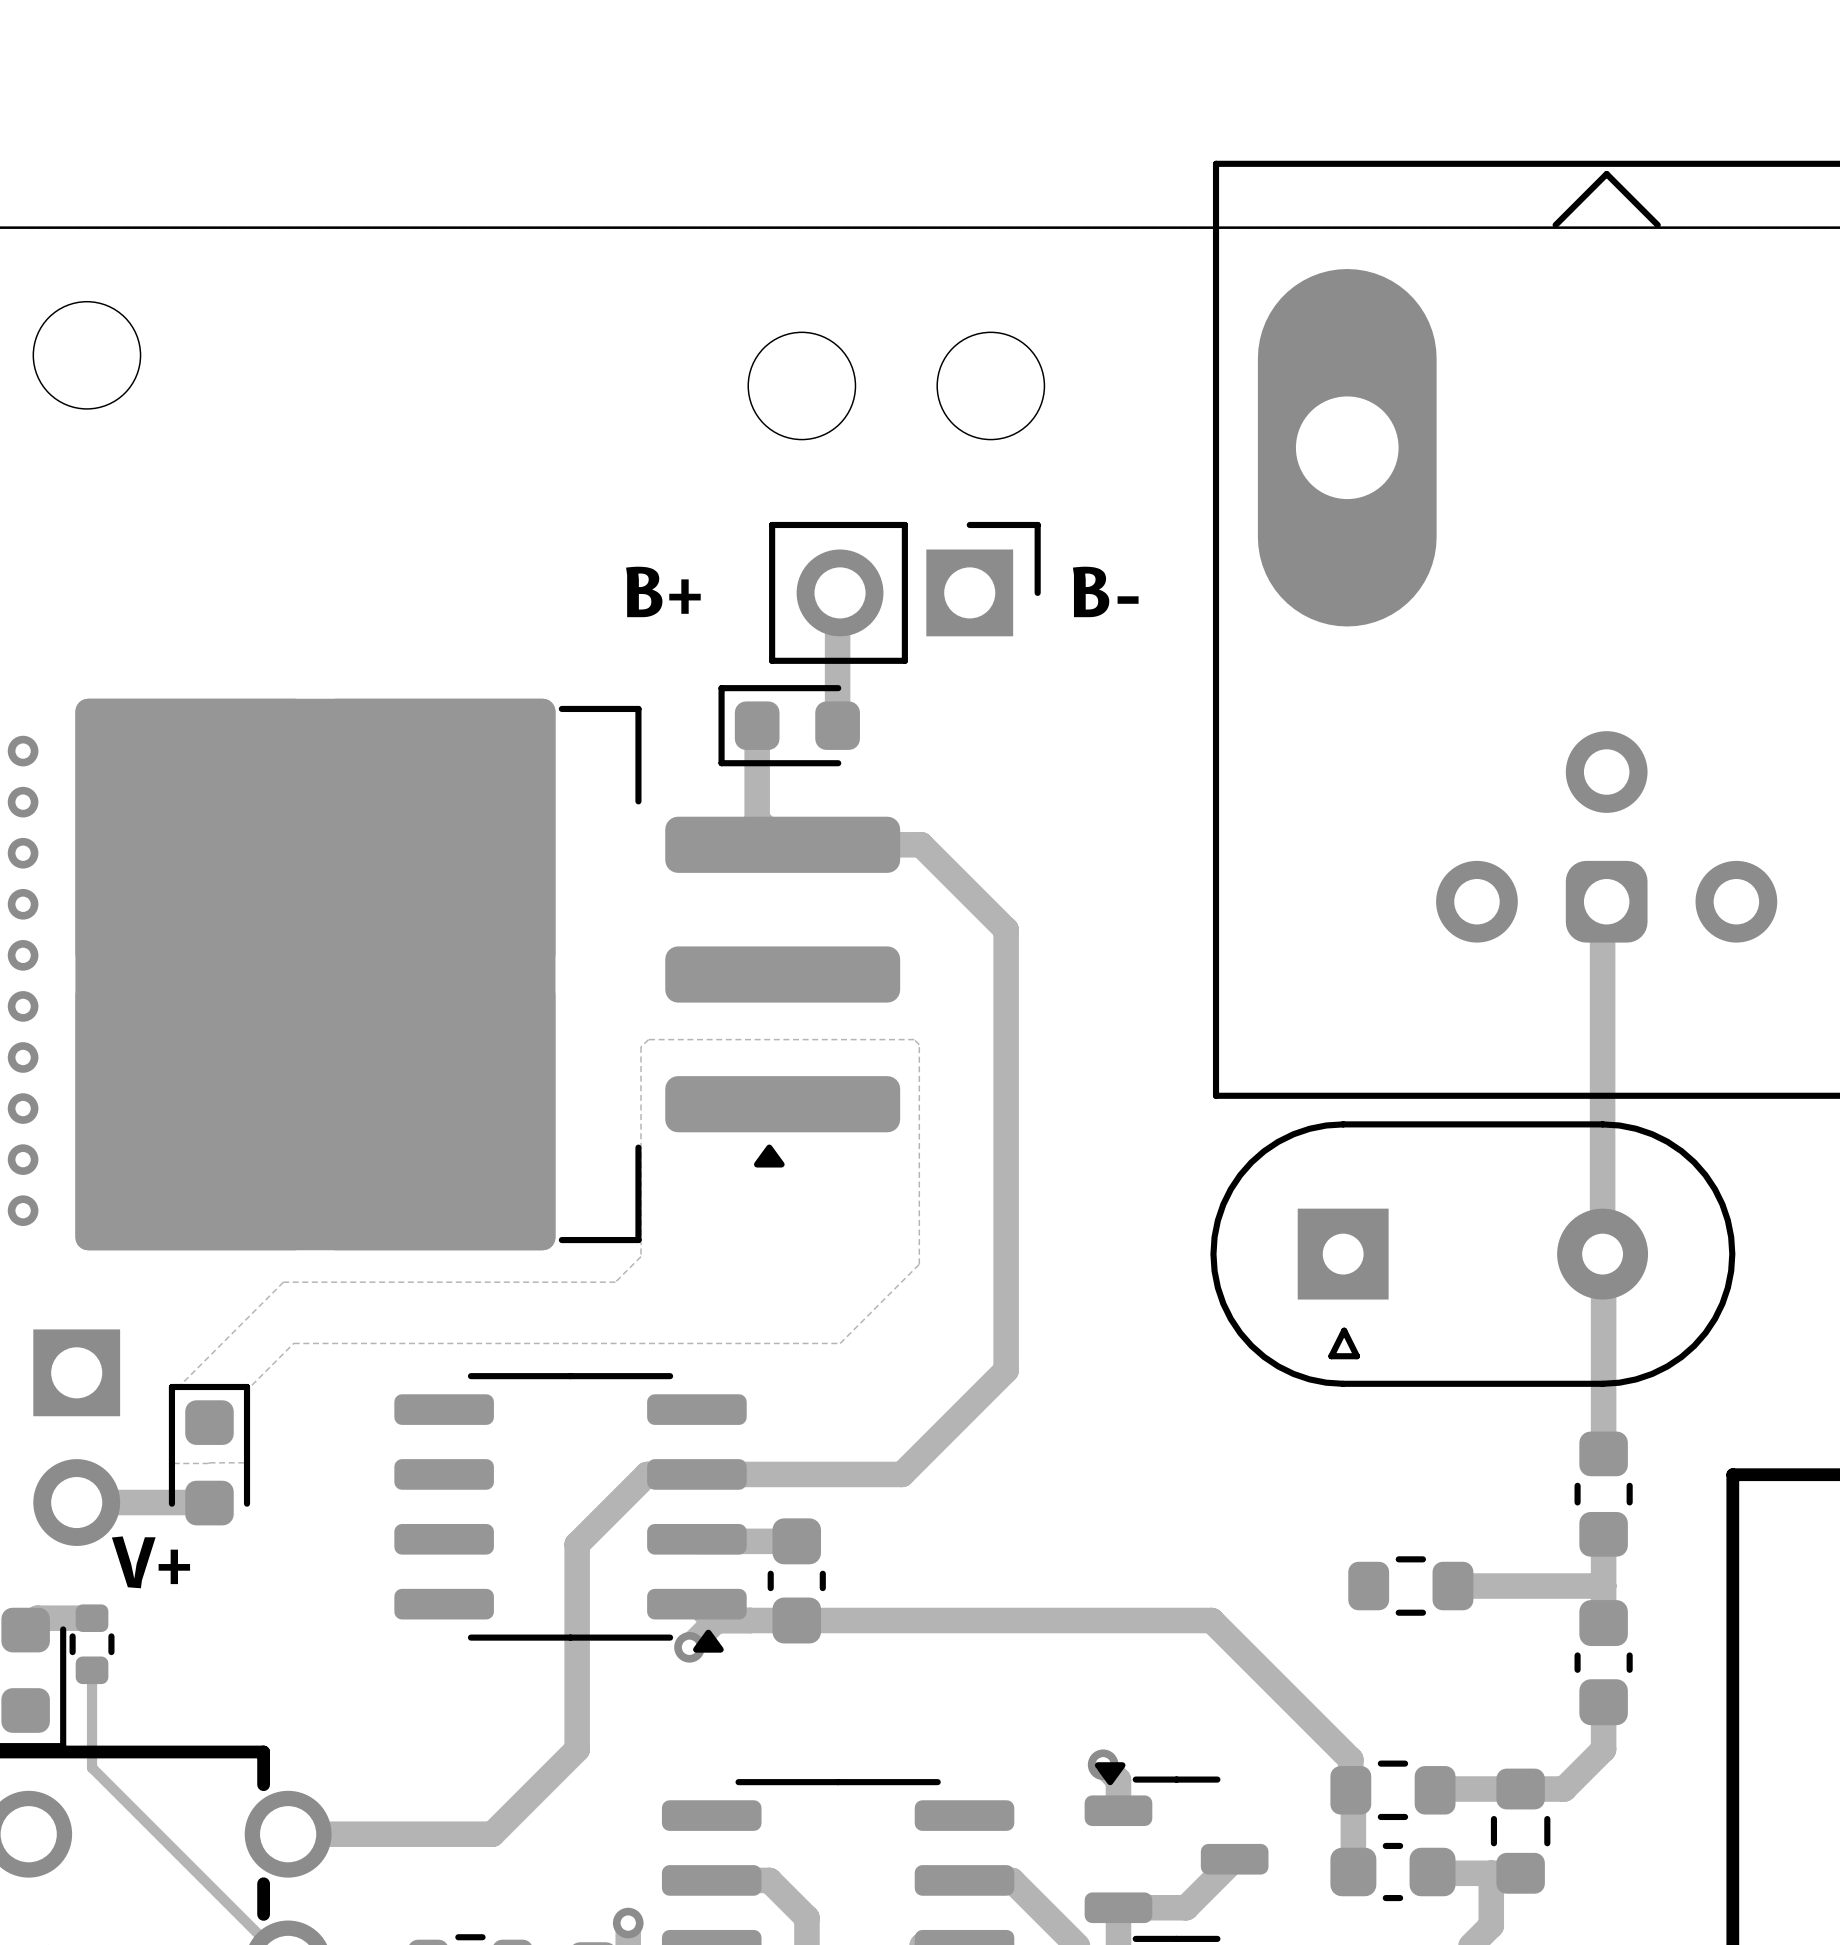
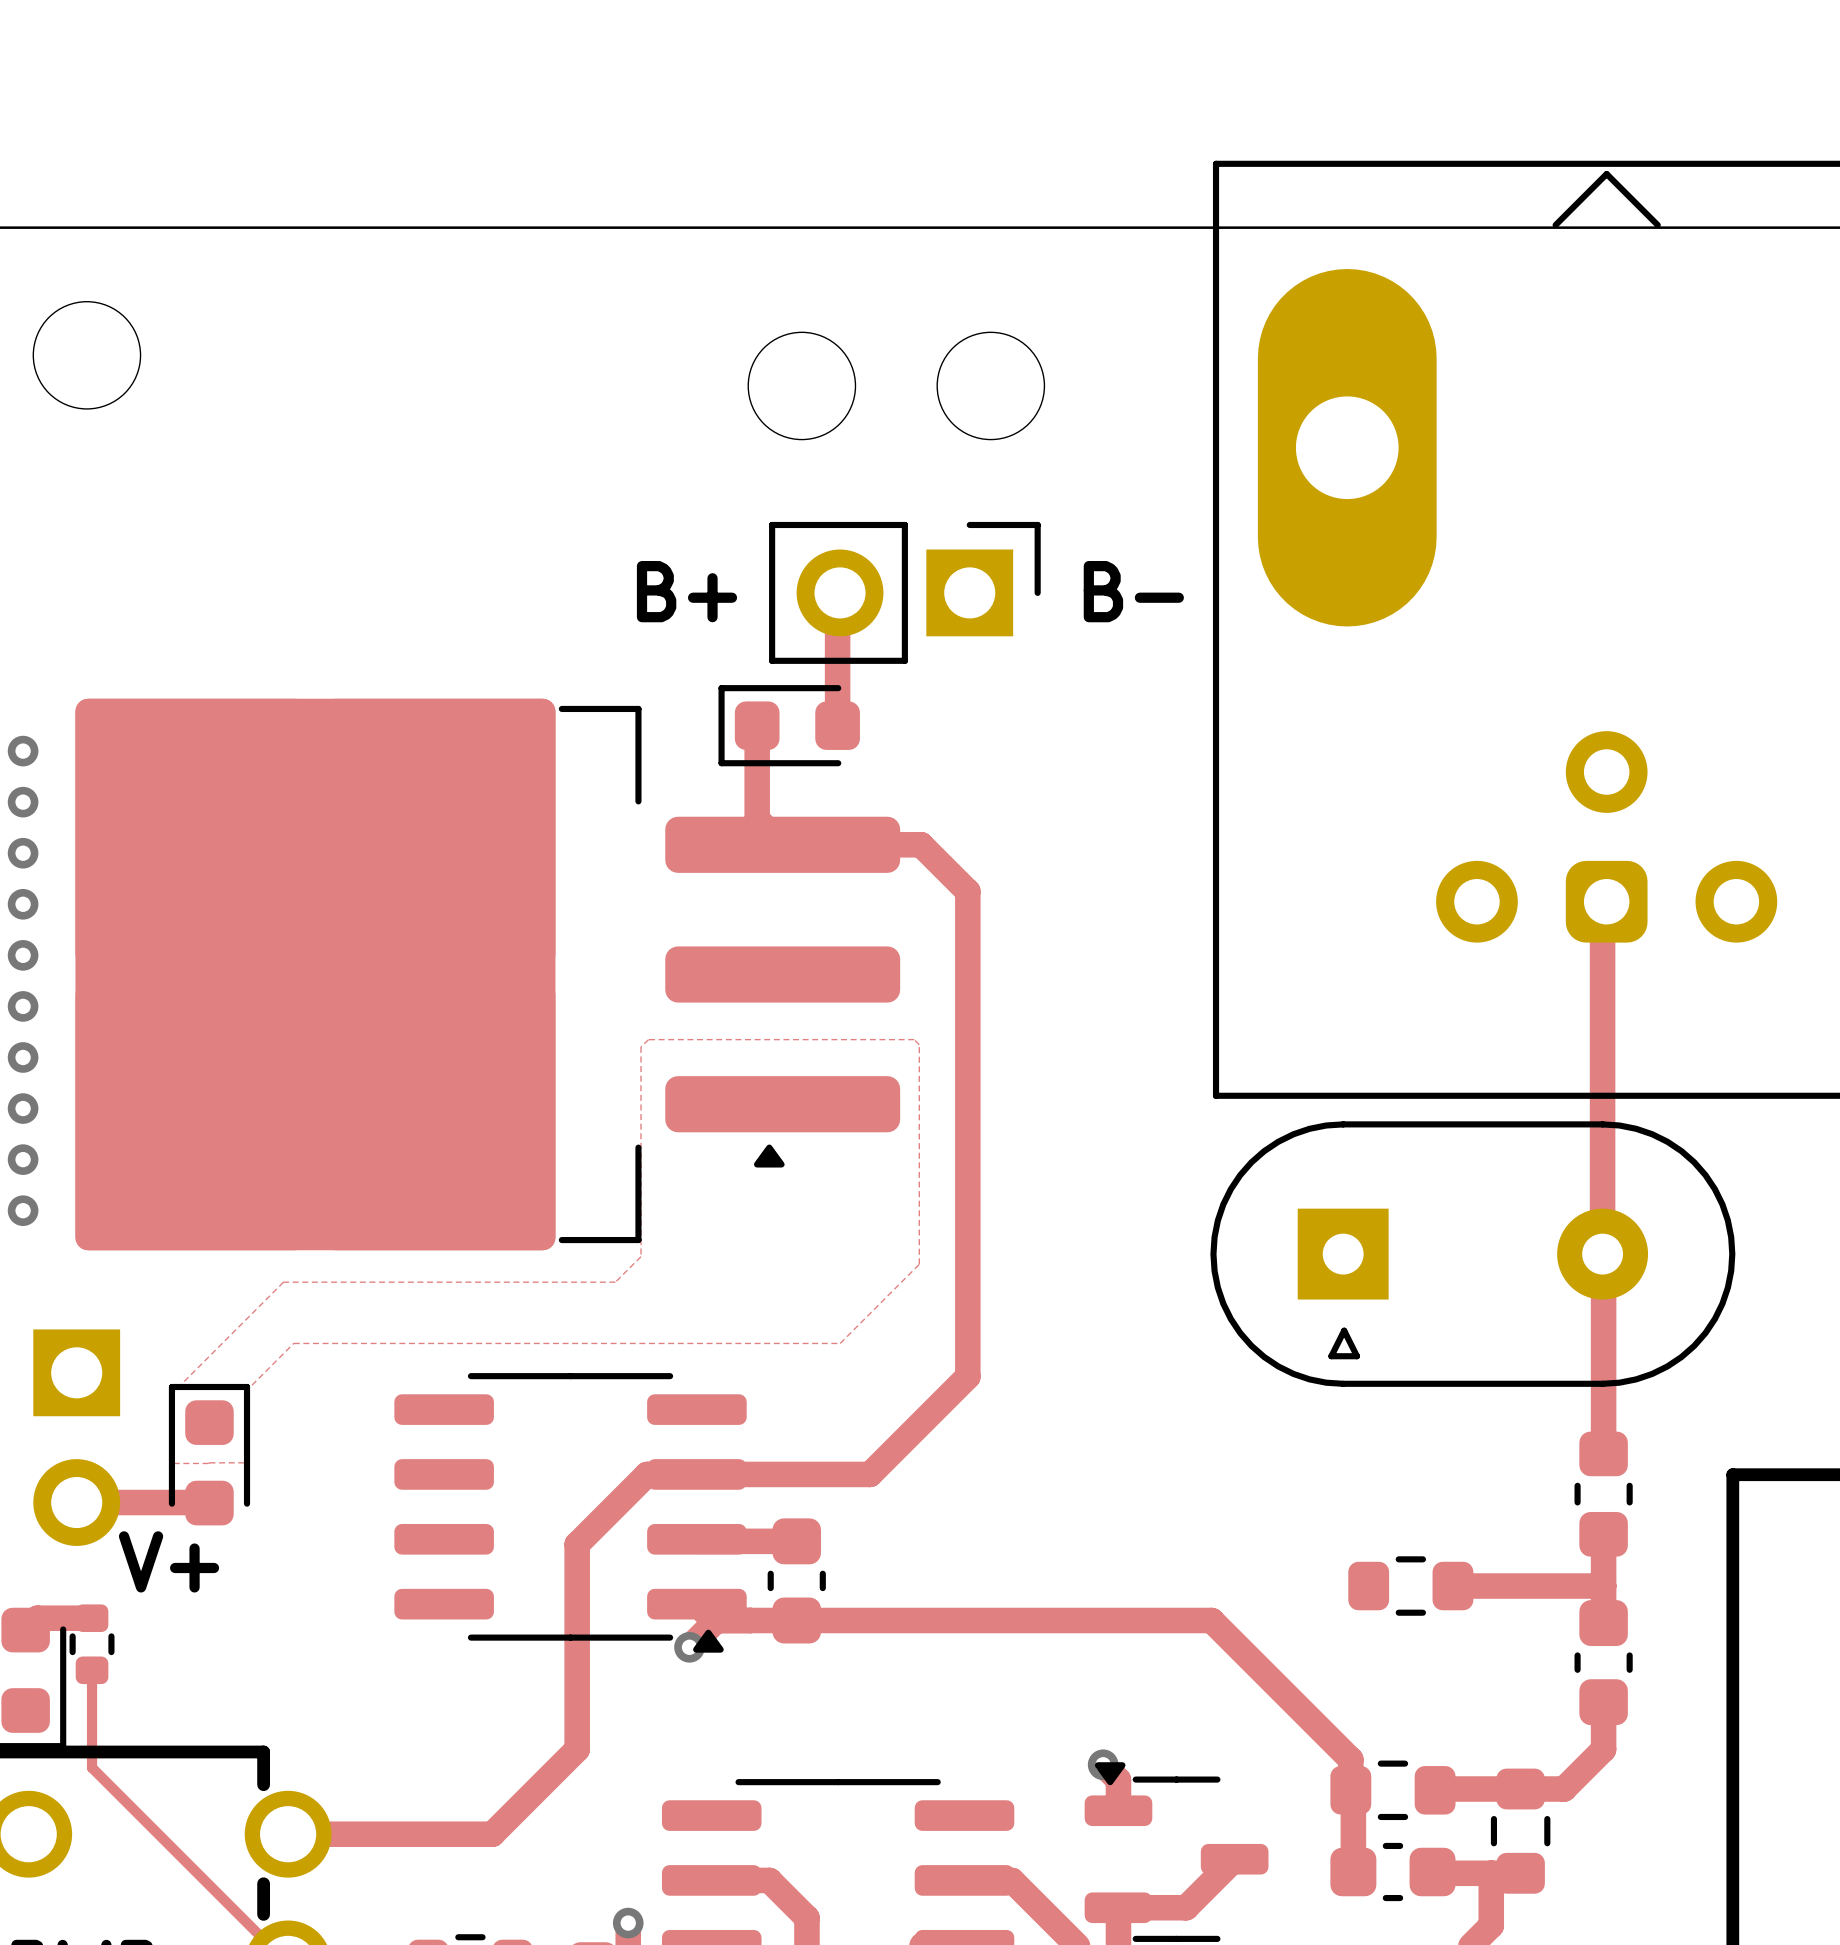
track: (967, 891) (1006, 929) (1006, 1370) (901, 1474) (870, 1474) -> (967, 891) (967, 1376) (870, 1474)

